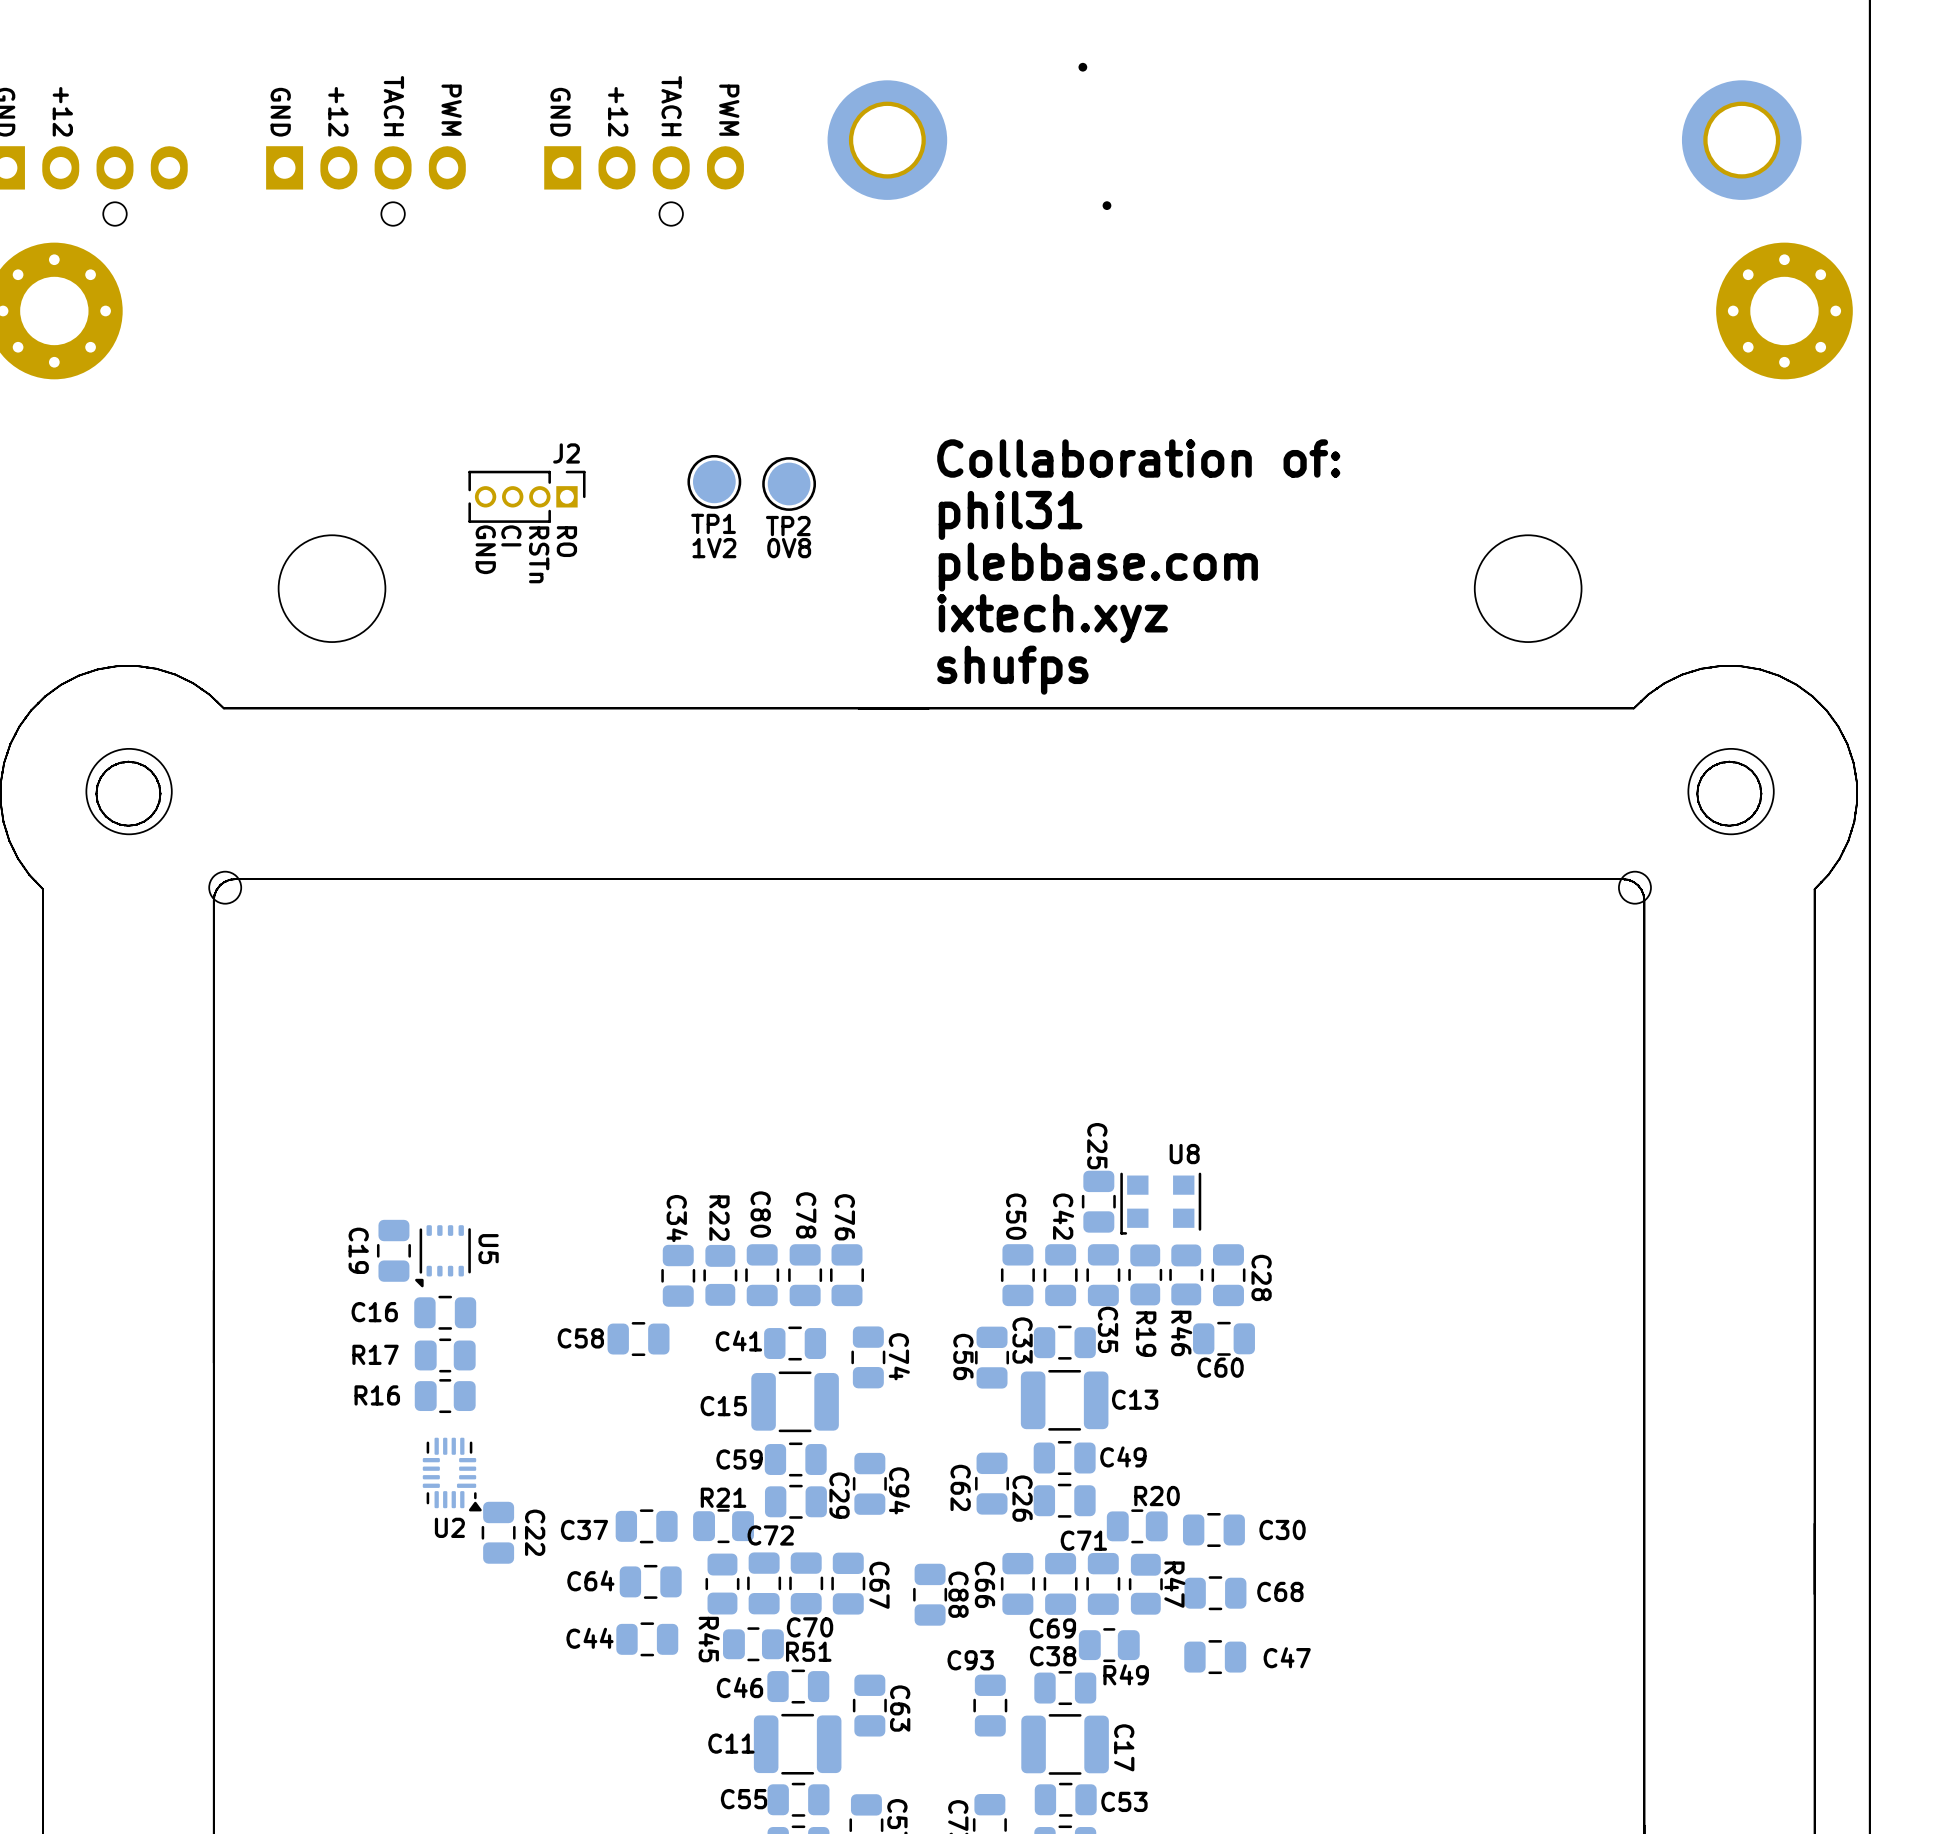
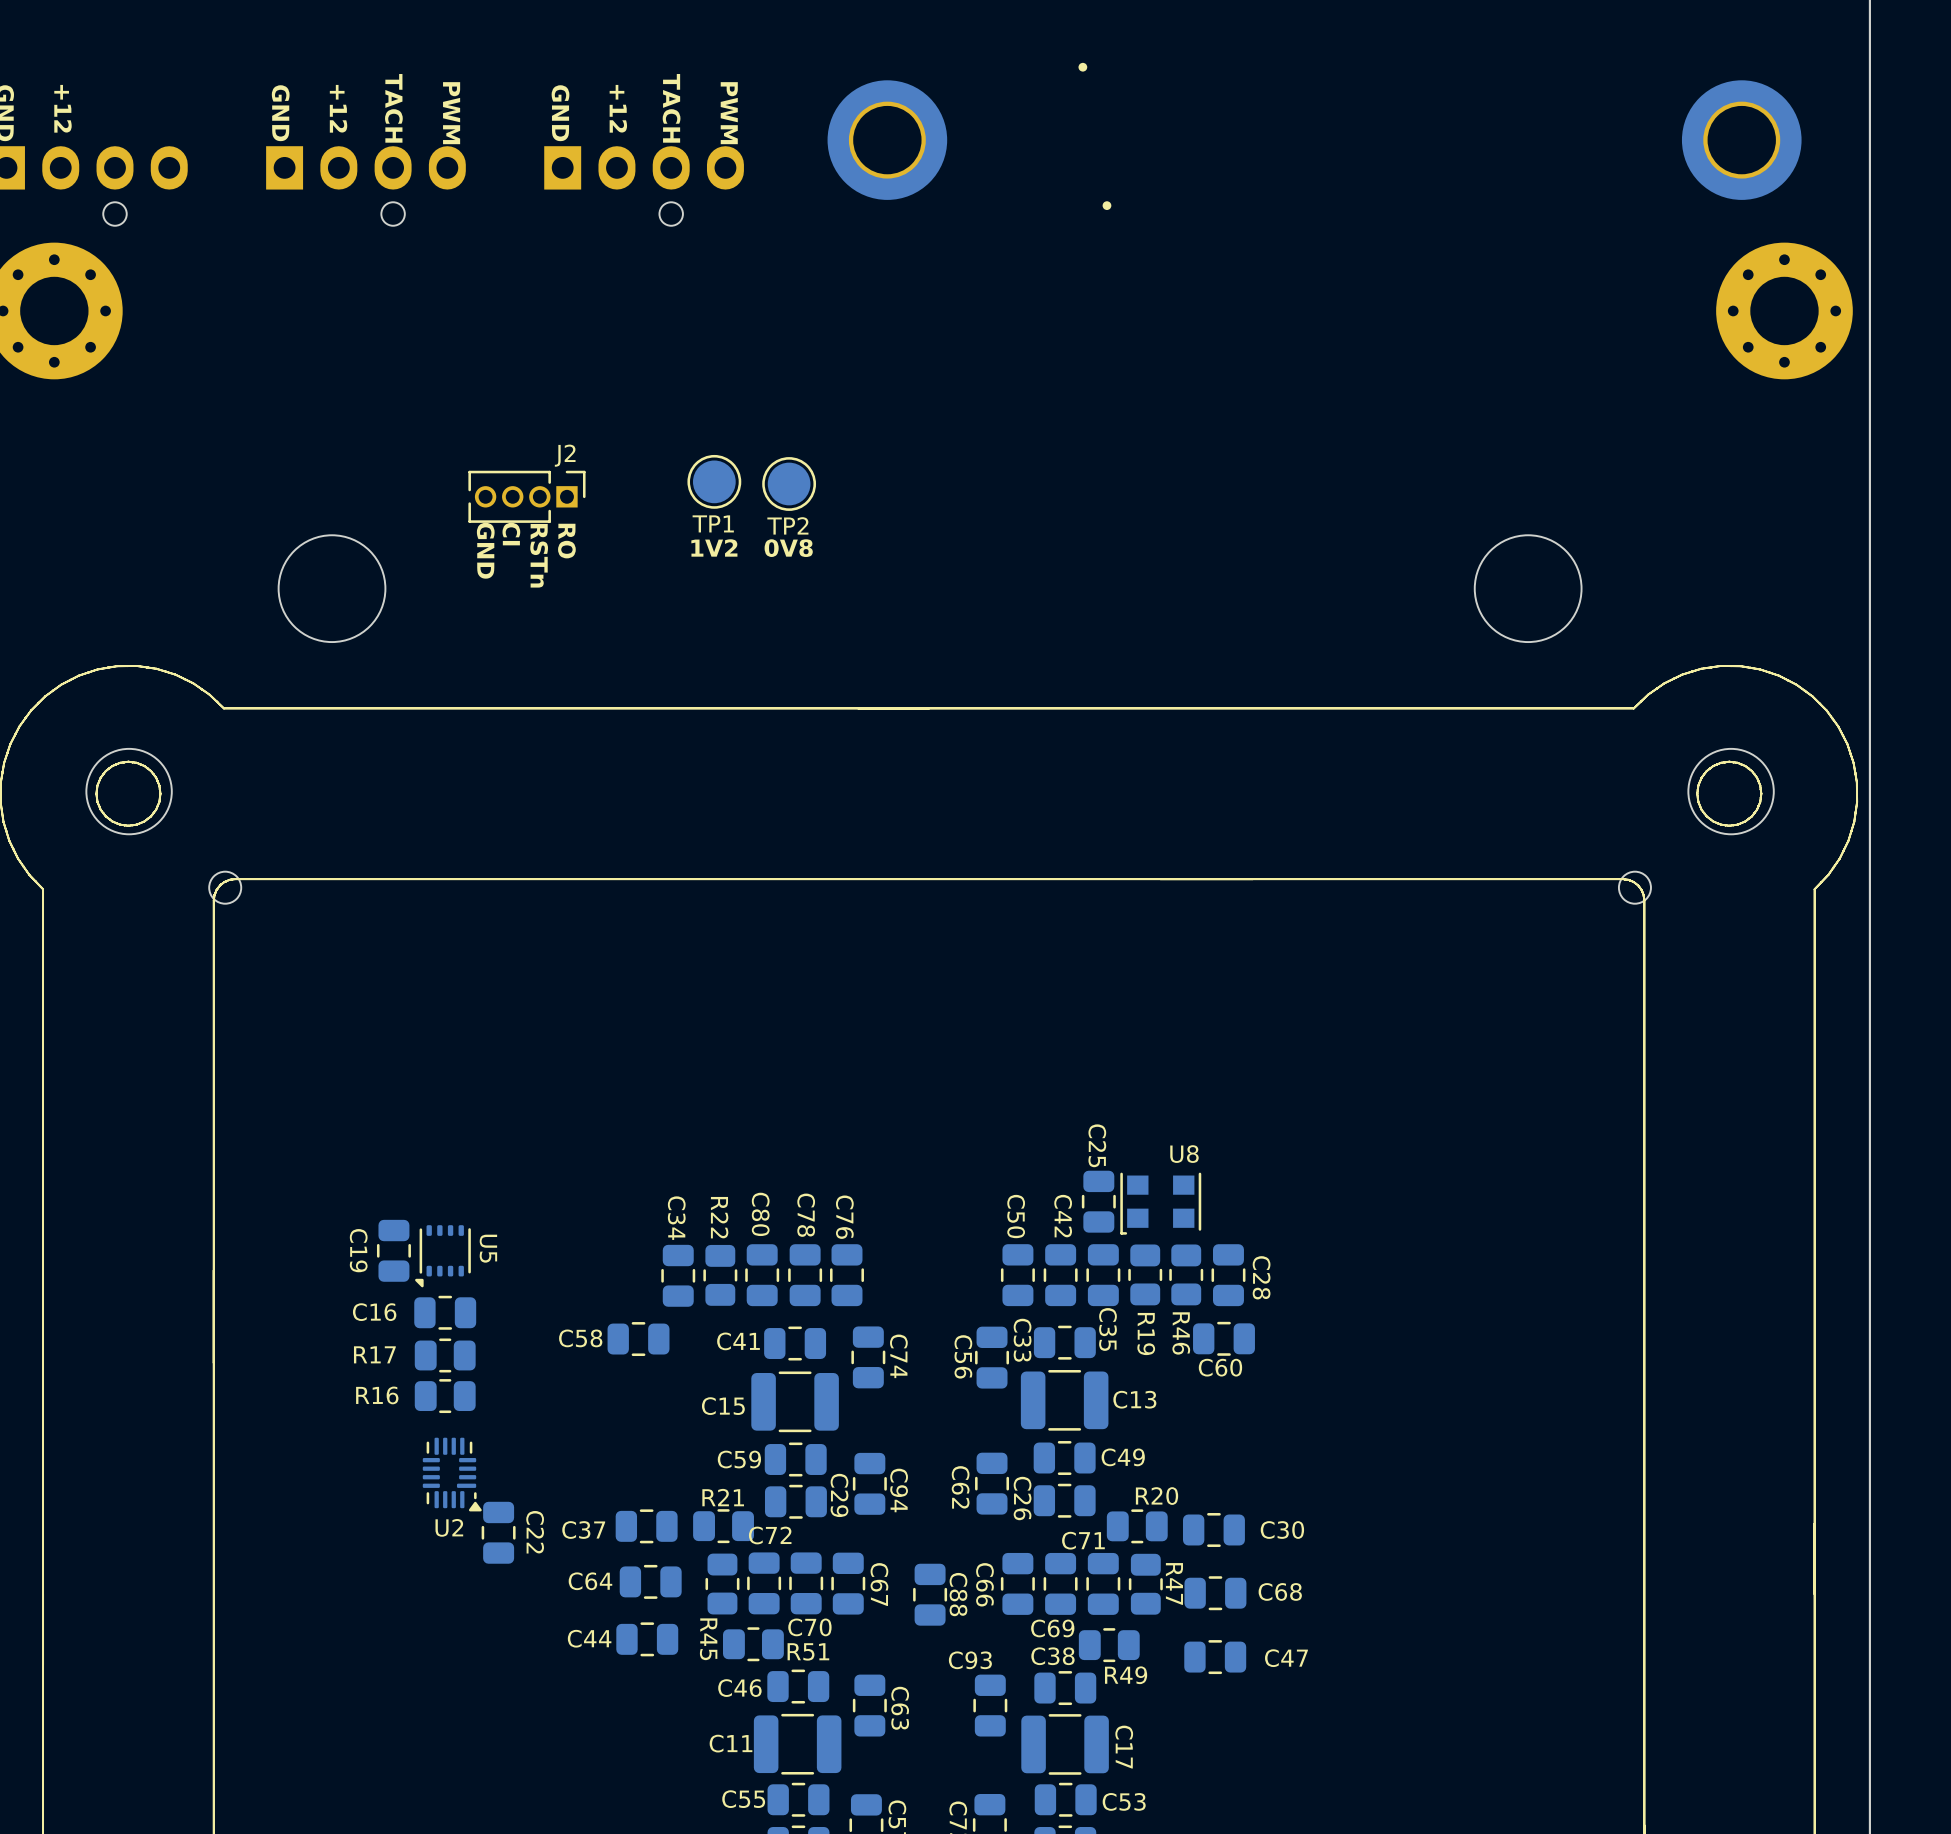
text: Collaboration of: (1138, 458) -> none
text: phil31 (1010, 515) -> none
text: plebbase.com (1098, 567) -> none
text: ixtech.xyz (1052, 618) -> none
text: shufps (1012, 670) -> none

